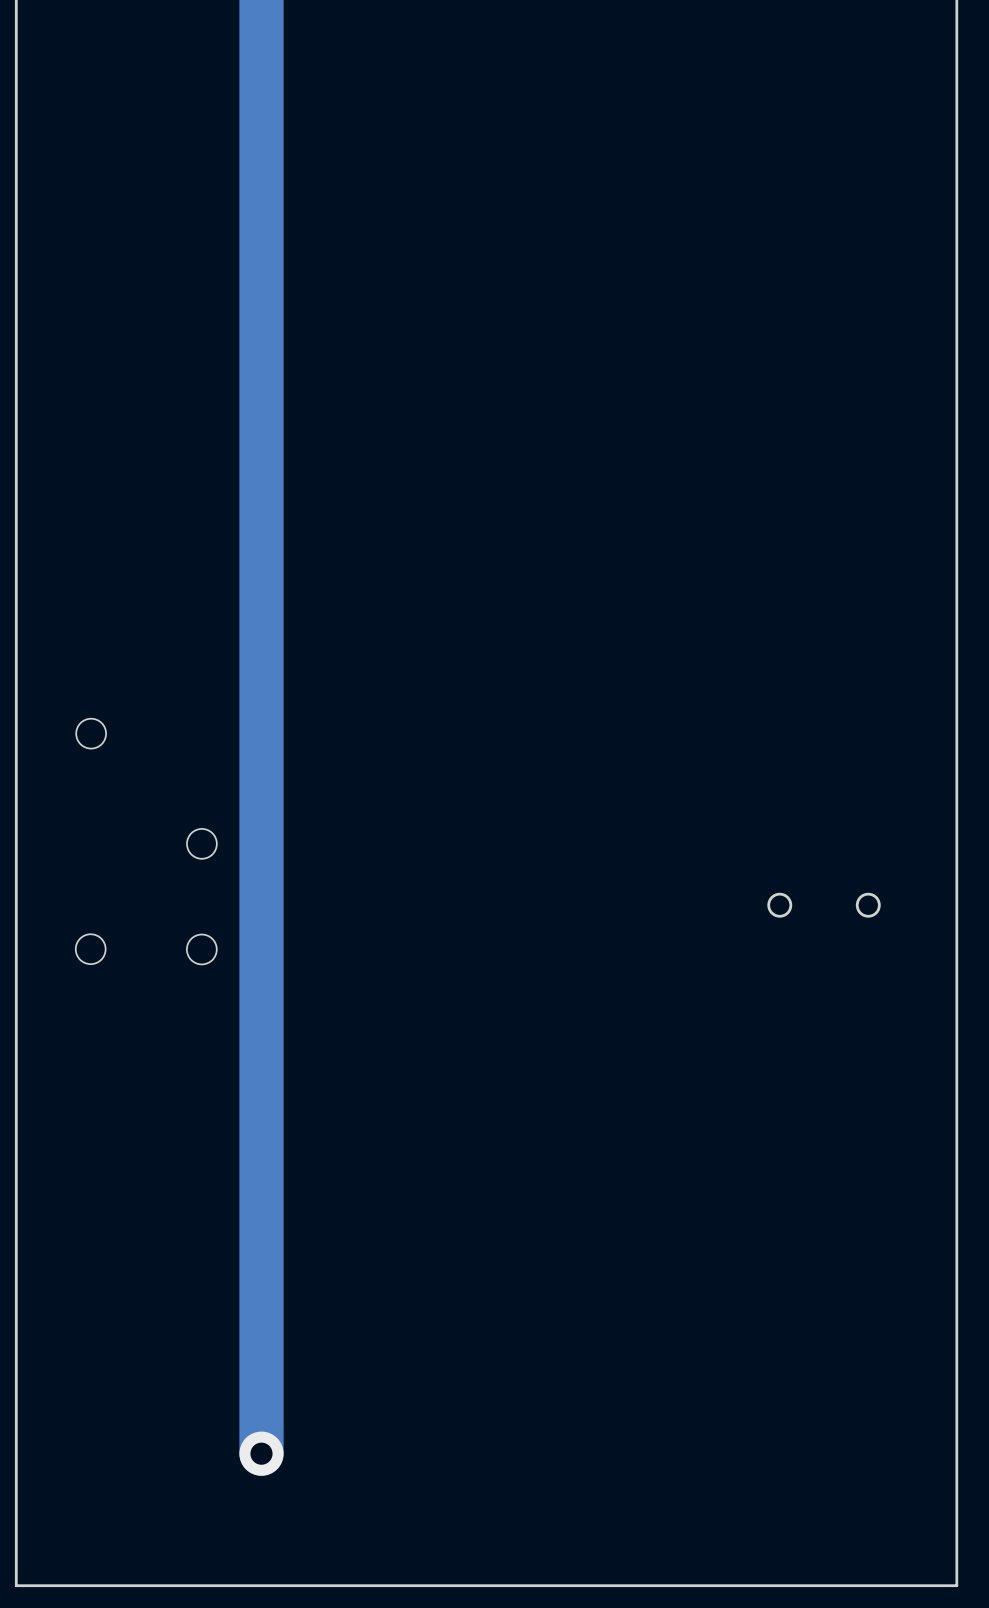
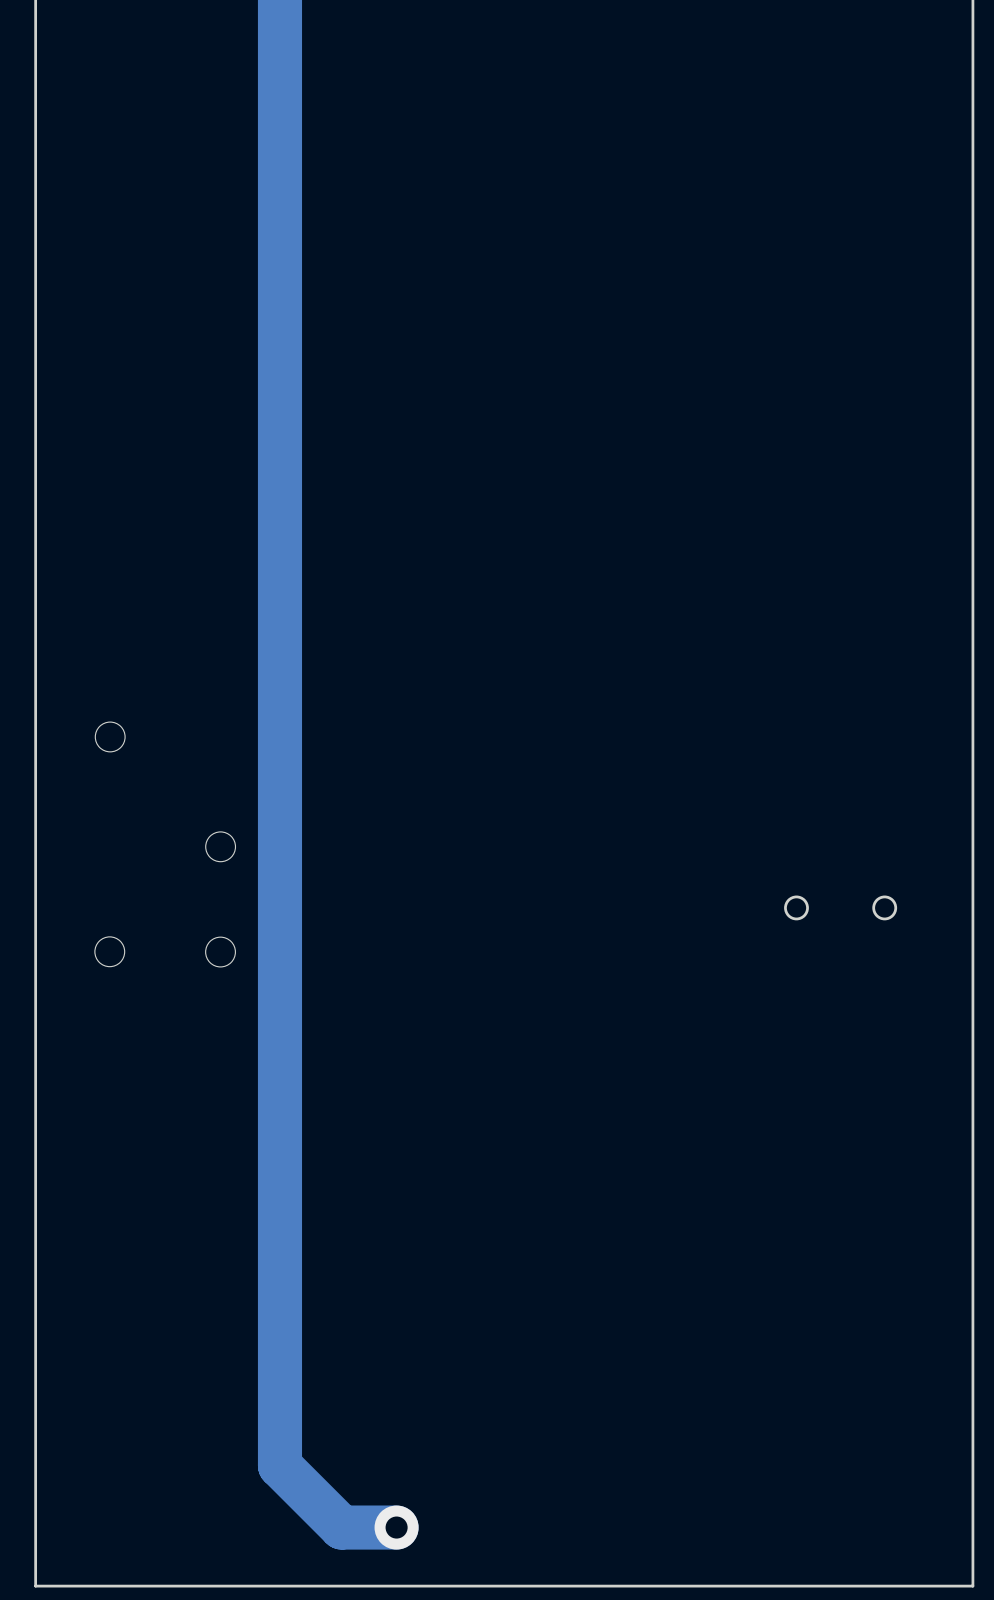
track: none -> (279, 1454) (279, 1465) (341, 1527) (396, 1527)
via: (261, 1453) -> none
via: none -> (396, 1527)

